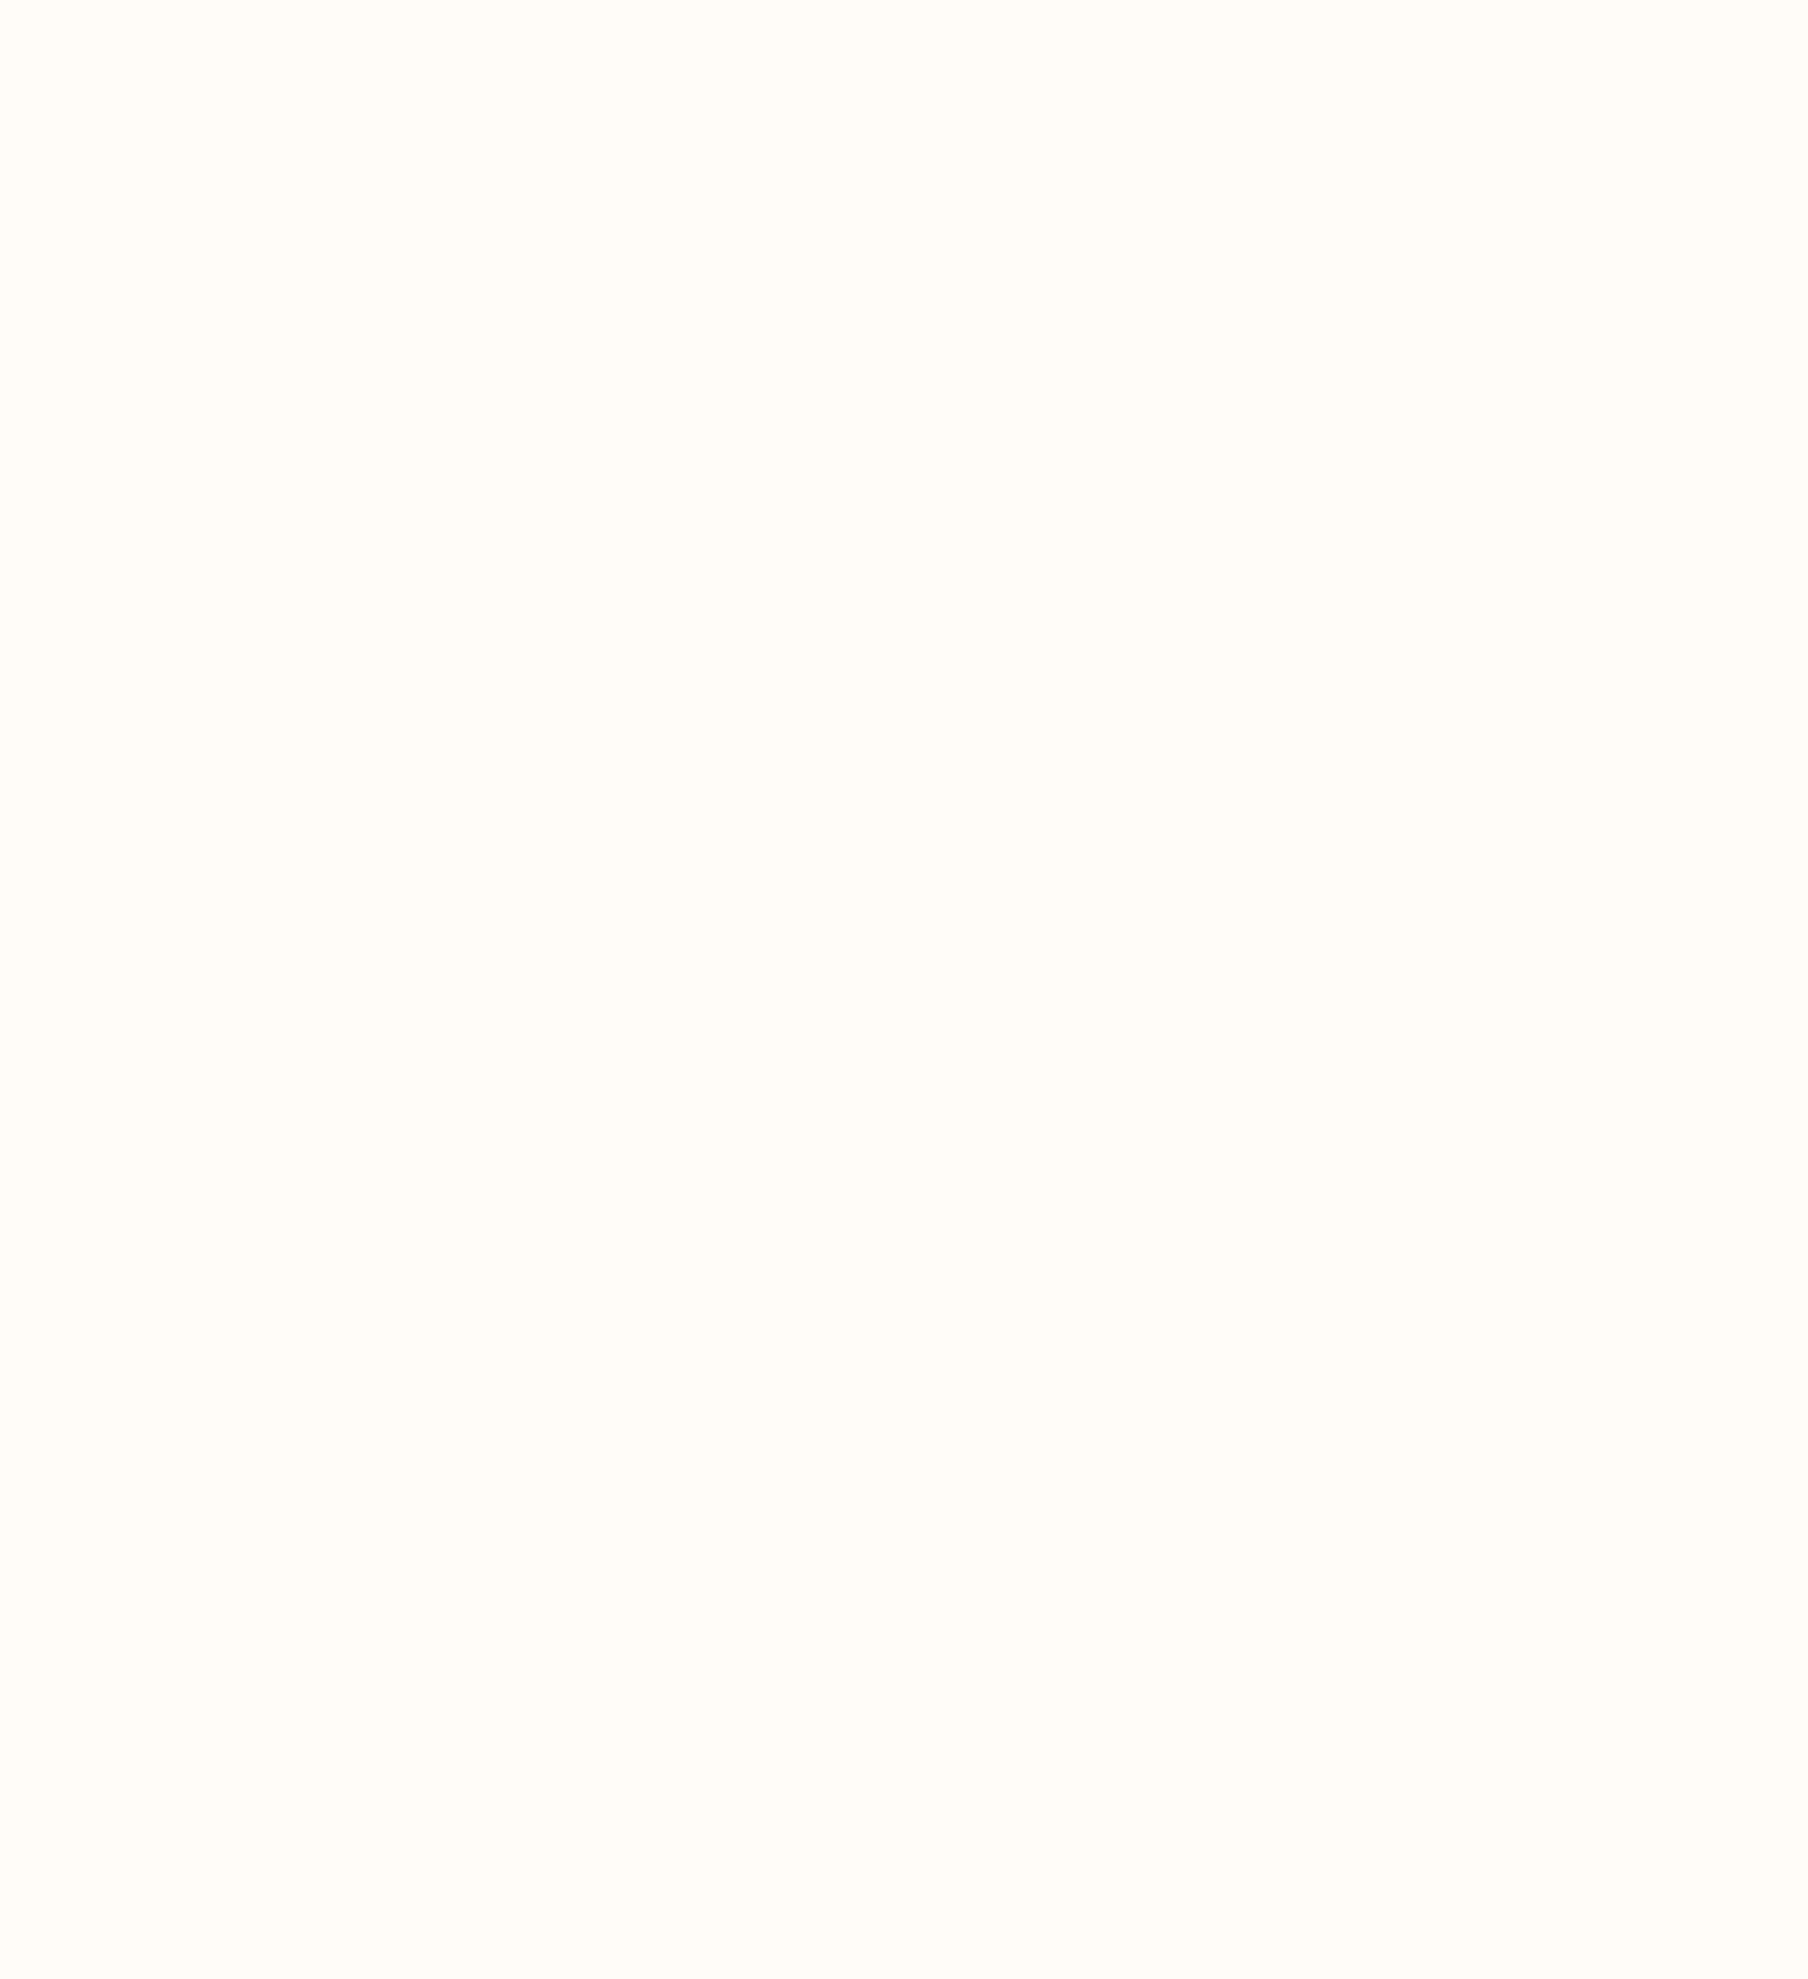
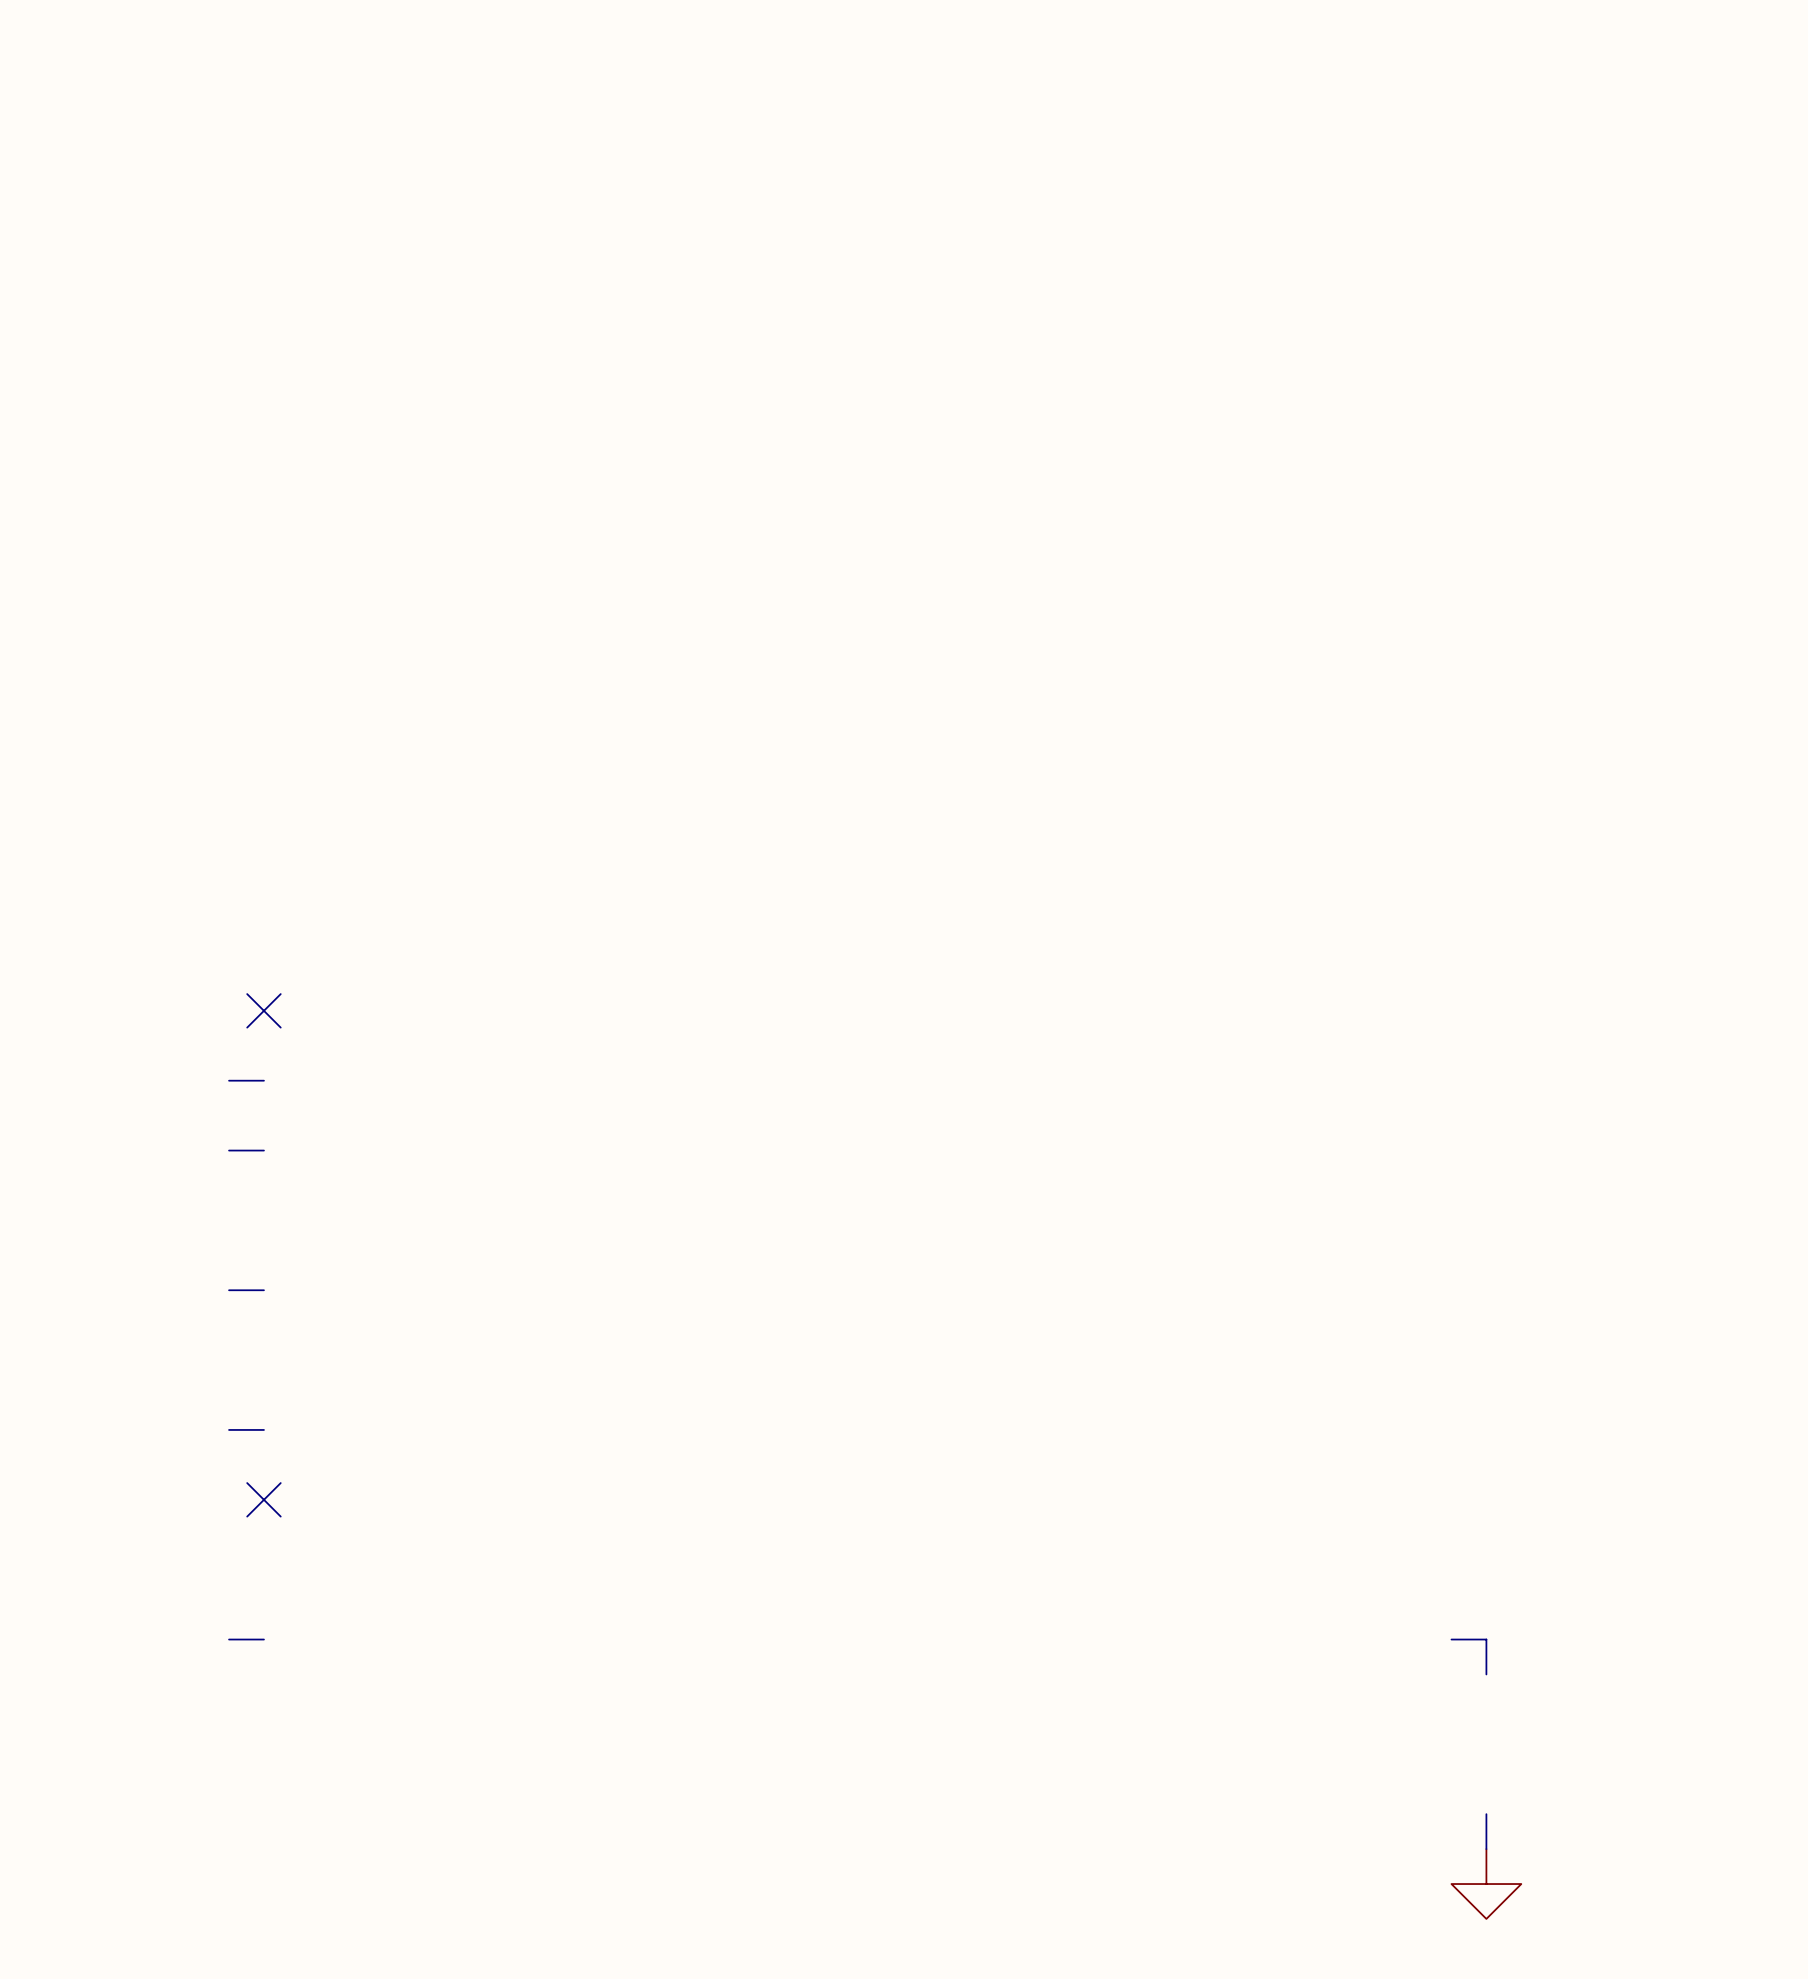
no-connect mark: none -> (263, 1010)
wire: none -> (229, 1080) (263, 1080)
wire: none -> (229, 1150) (263, 1150)
wire: none -> (229, 1290) (263, 1290)
wire: none -> (229, 1429) (263, 1429)
no-connect mark: none -> (263, 1499)
wire: none -> (229, 1639) (263, 1639)
wire: none -> (1451, 1639) (1486, 1639) (1486, 1674)
wire: none -> (1486, 1814) (1486, 1849)
power symbol: none -> (1486, 1884)

